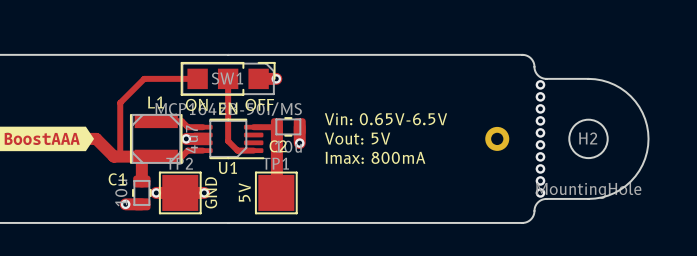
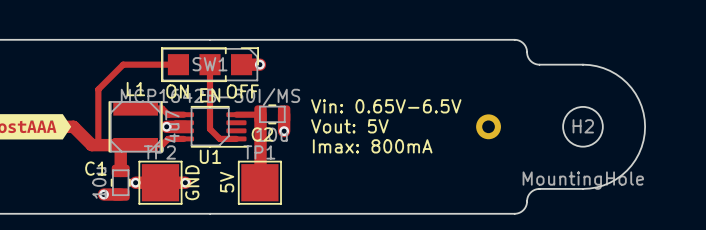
via: (540, 84) -> none
via: (540, 96) -> none
via: (540, 108) -> none
via: (540, 120) -> none
via: (540, 132) -> none
via: (540, 144) -> none
via: (540, 156) -> none
via: (540, 168) -> none
via: (540, 180) -> none
via: (540, 192) -> none

